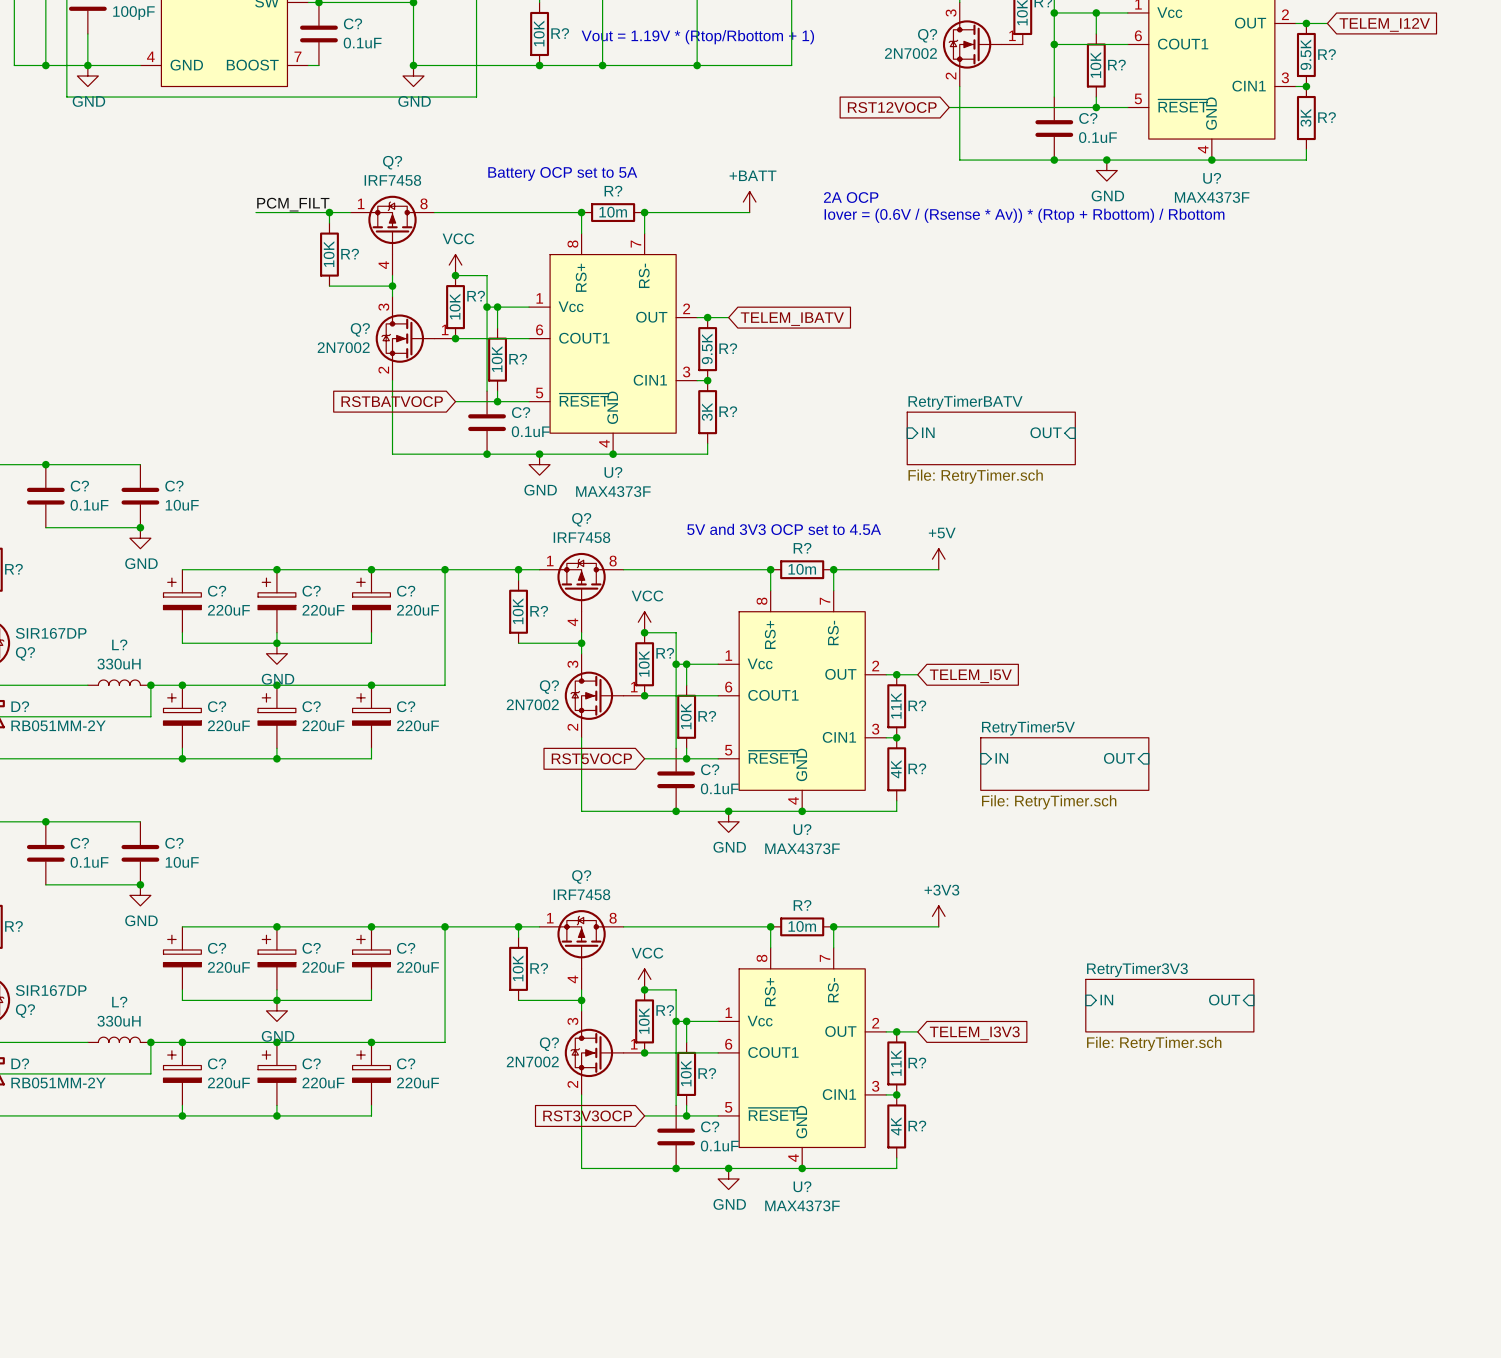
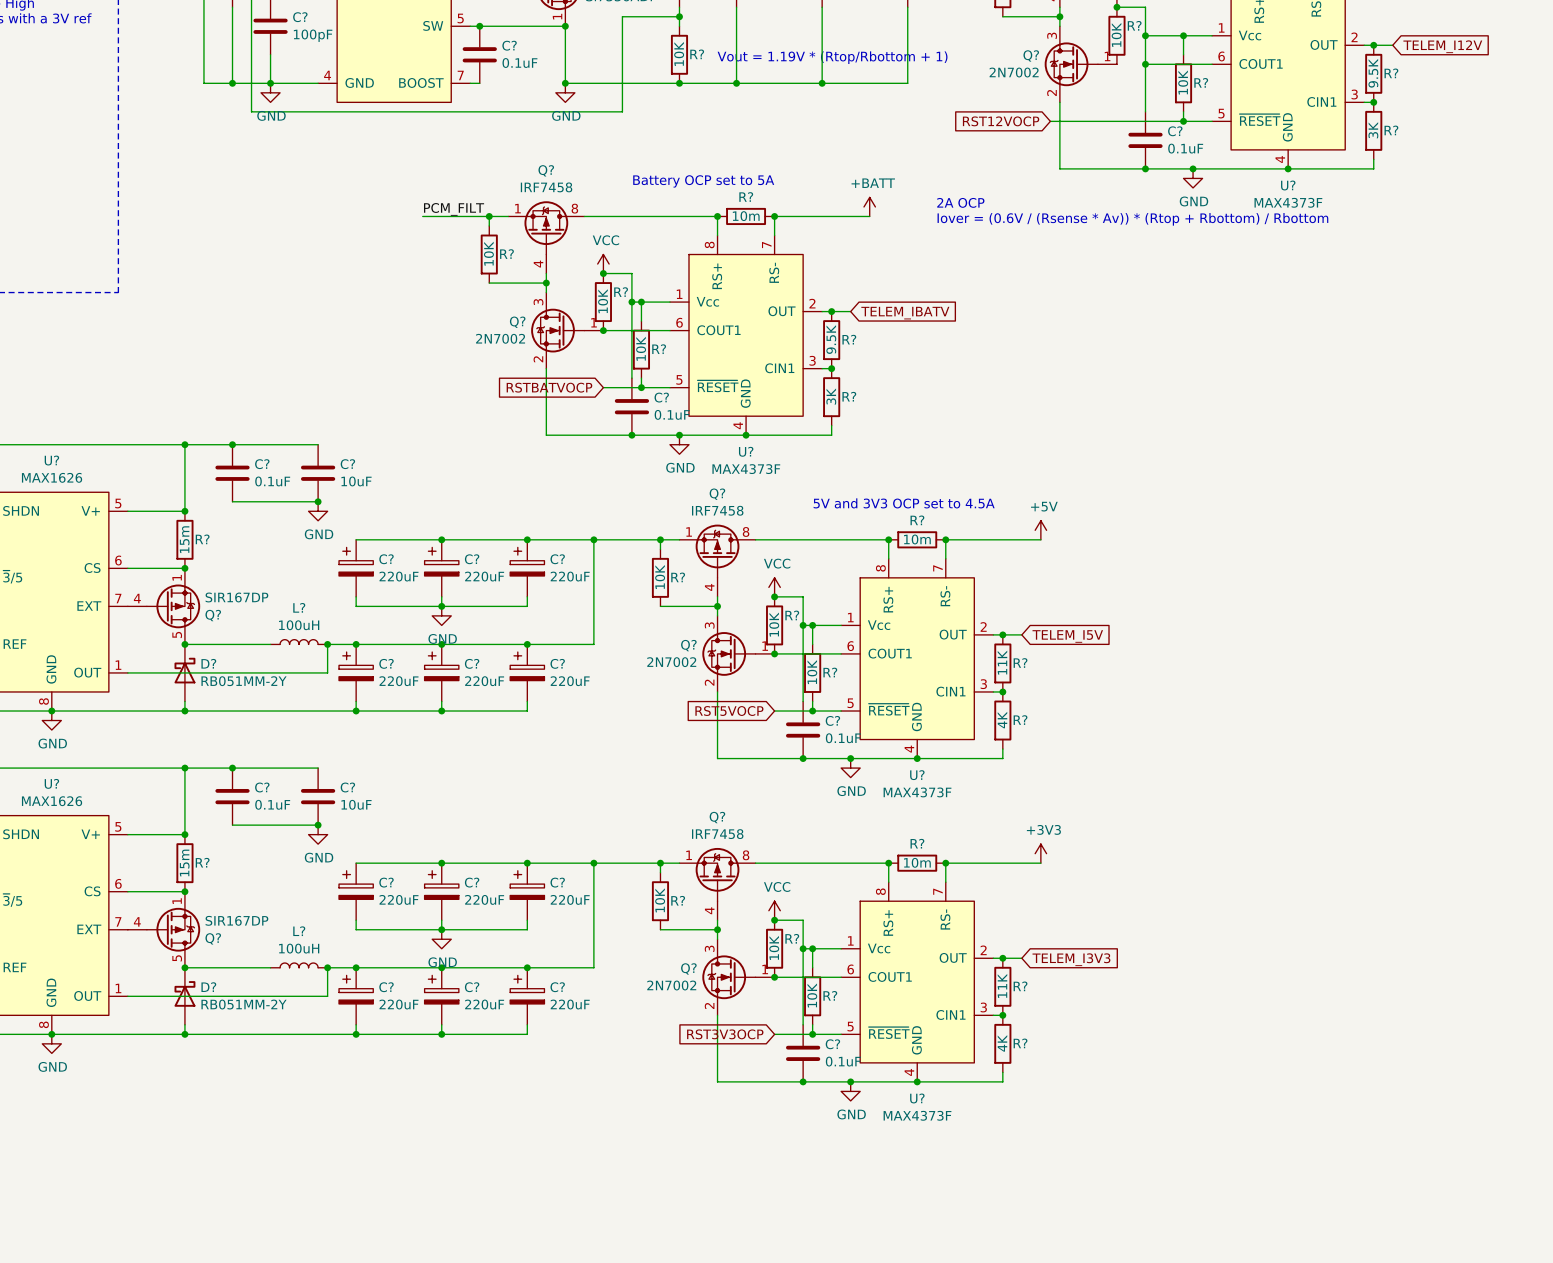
sheet pin: IN (928, 432) -> none
sheet pin: OUT (1046, 432) -> none
sheet RetryTimerBATV: File: RetryTimer.sch (991, 438) -> none
L? value: 330uH (119, 664) -> 100uH (299, 625)
sheet pin: IN (1001, 758) -> none
sheet pin: OUT (1119, 758) -> none
sheet RetryTimer5V: File: RetryTimer.sch (1064, 764) -> none
sheet pin: IN (1106, 1000) -> none
sheet pin: OUT (1224, 1000) -> none
sheet RetryTimer3V3: File: RetryTimer.sch (1169, 1005) -> none
L? value: 330uH (119, 1021) -> 100uH (299, 948)

